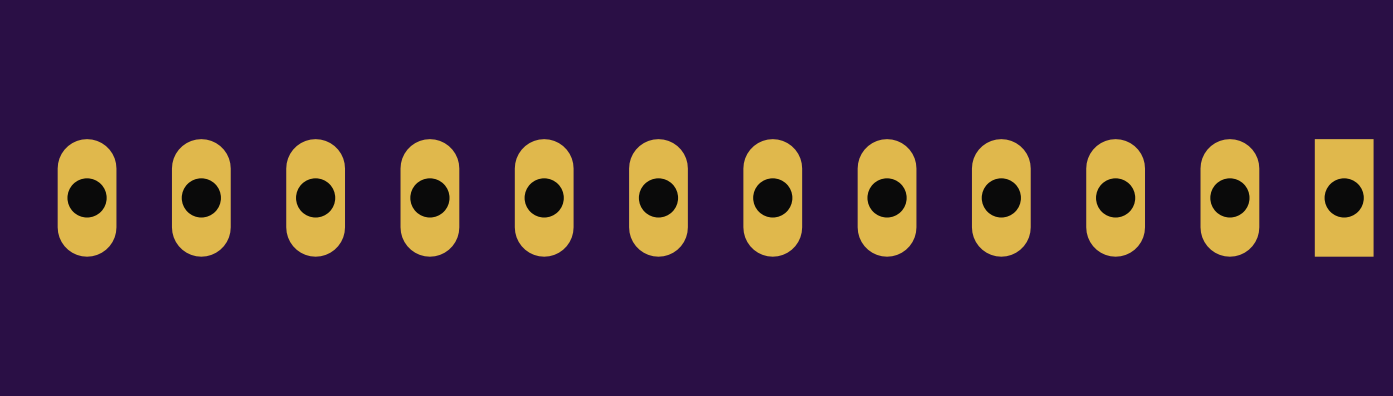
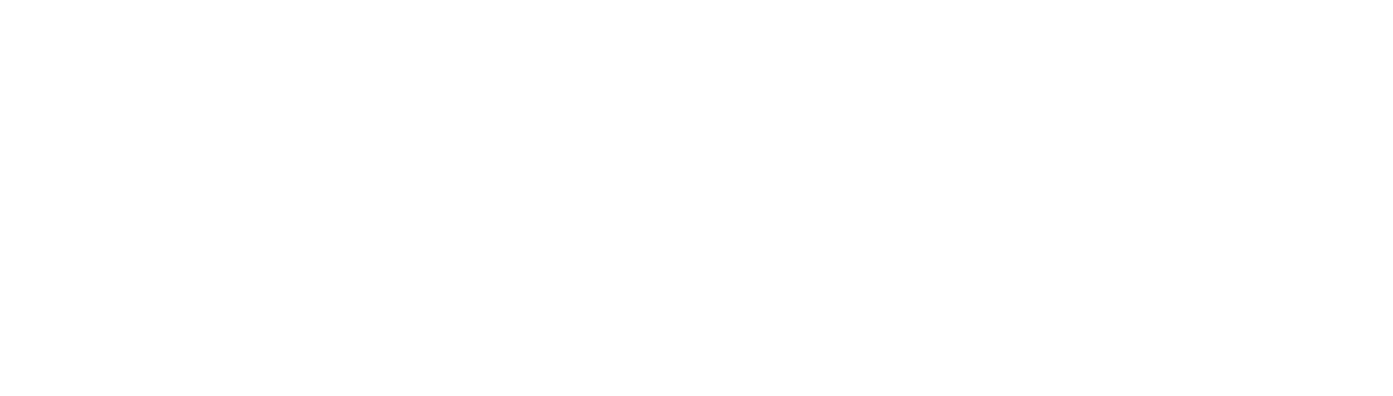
part: (715, 197) -> none

